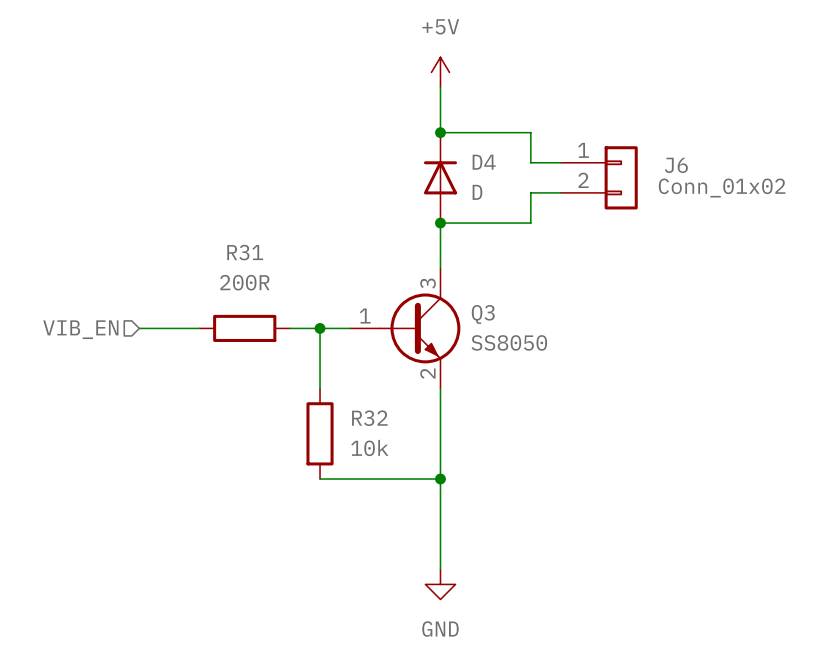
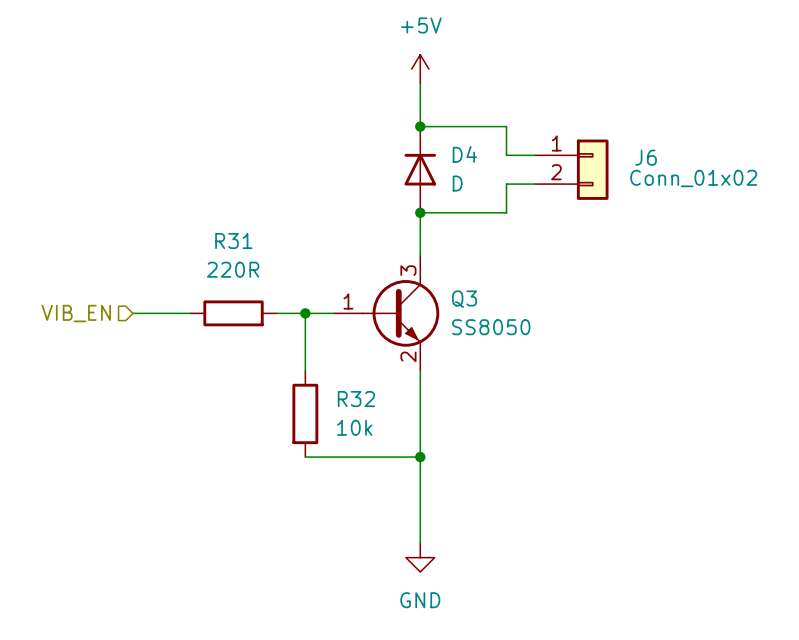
R31 value: 200R (244, 282) -> 220R (233, 269)

